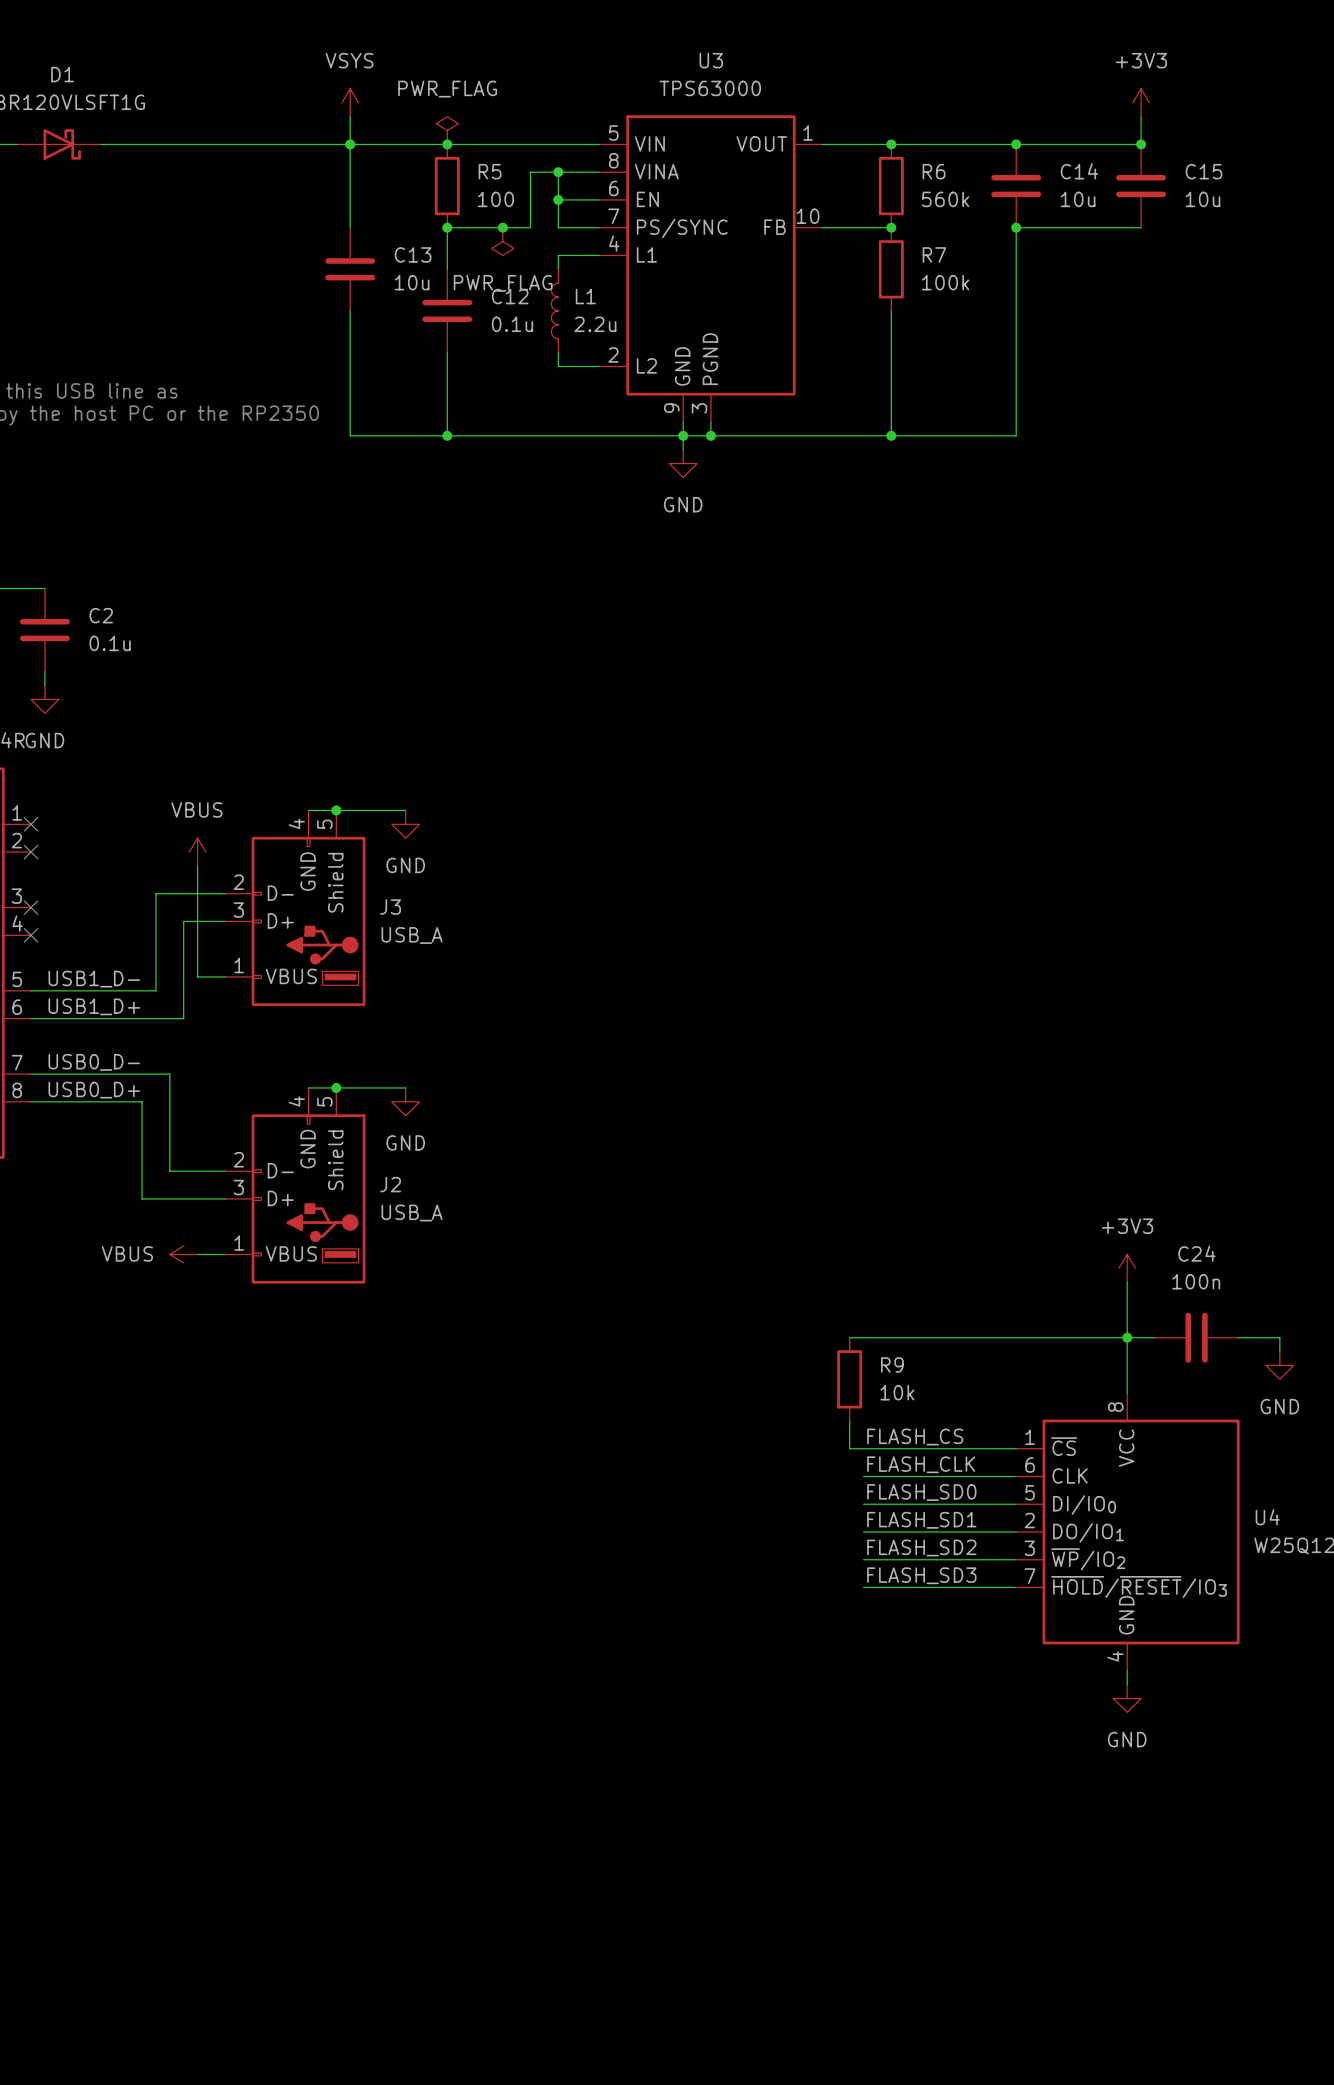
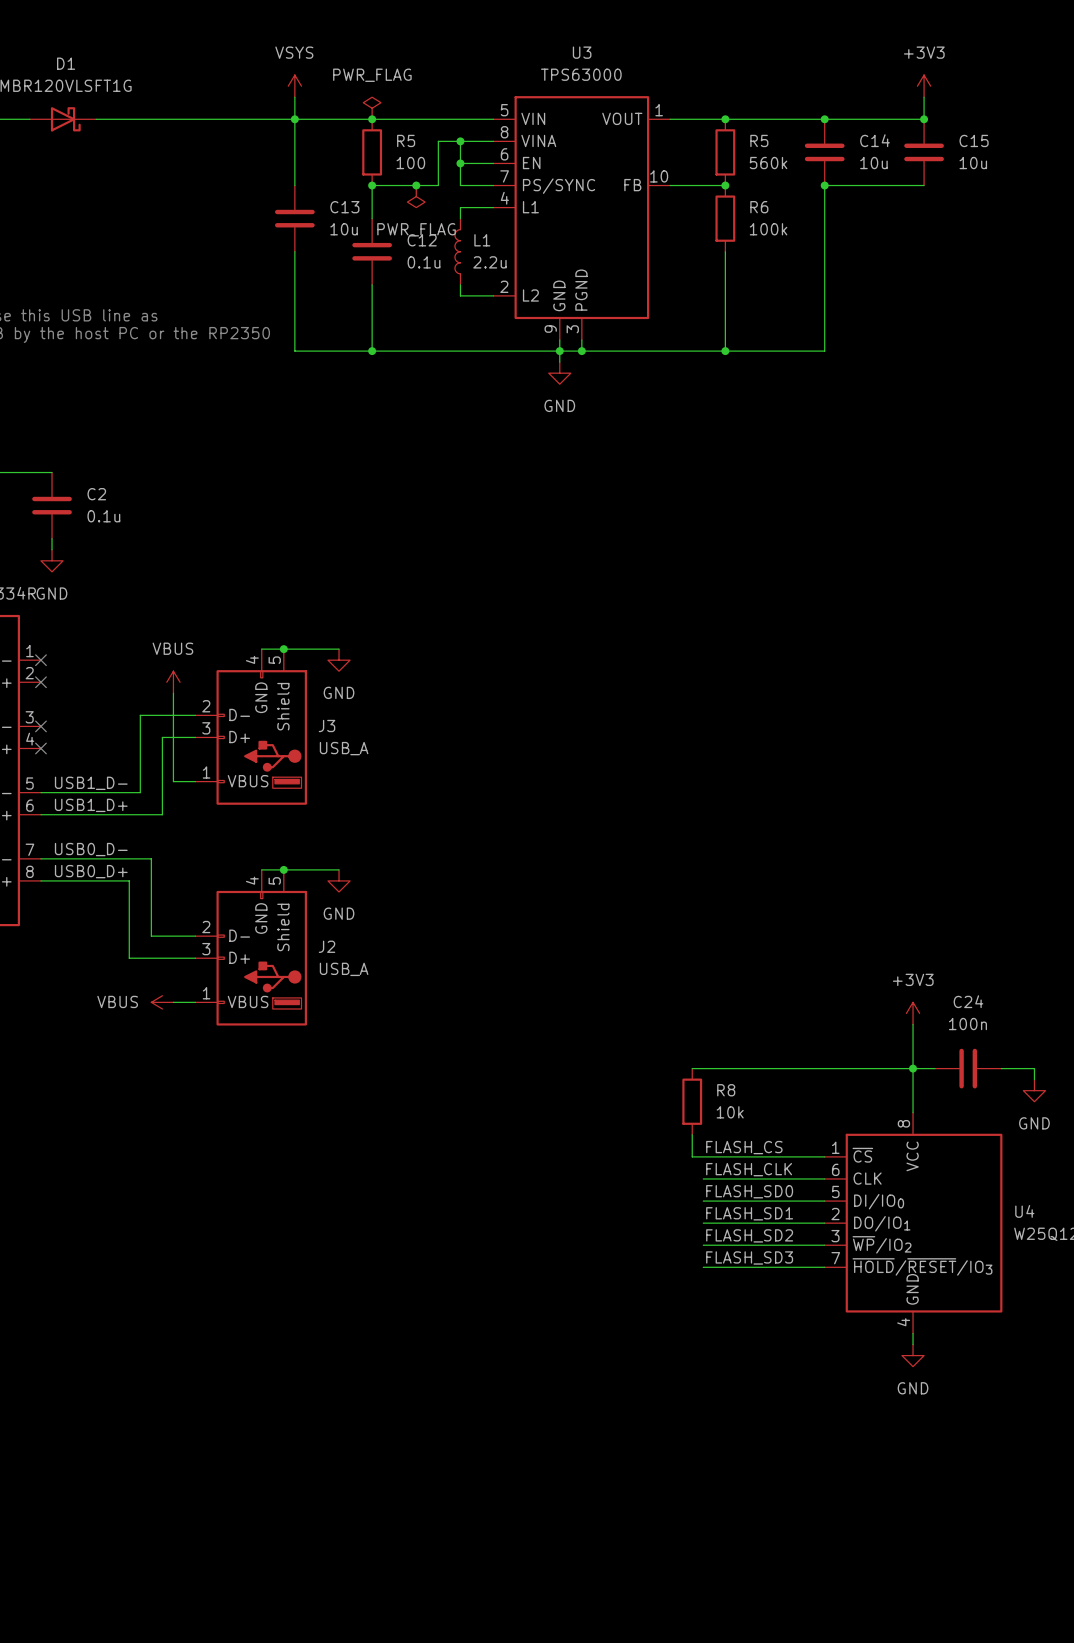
R6 name: R6 (934, 171) -> R5 (759, 140)
R7 name: R7 (934, 254) -> R6 (759, 207)
R9 name: R9 (892, 1364) -> R8 (726, 1090)

